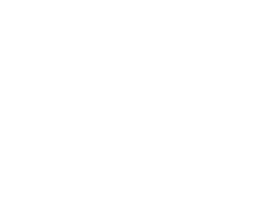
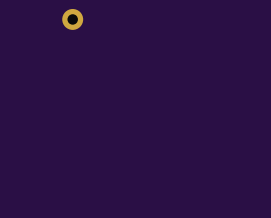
via: none -> (72, 19)

